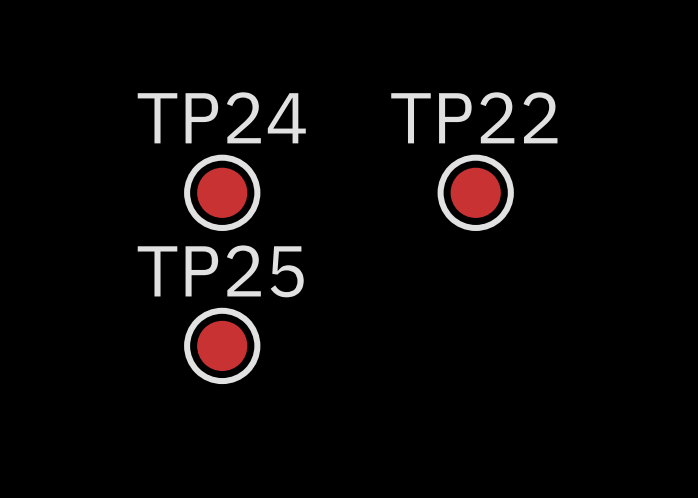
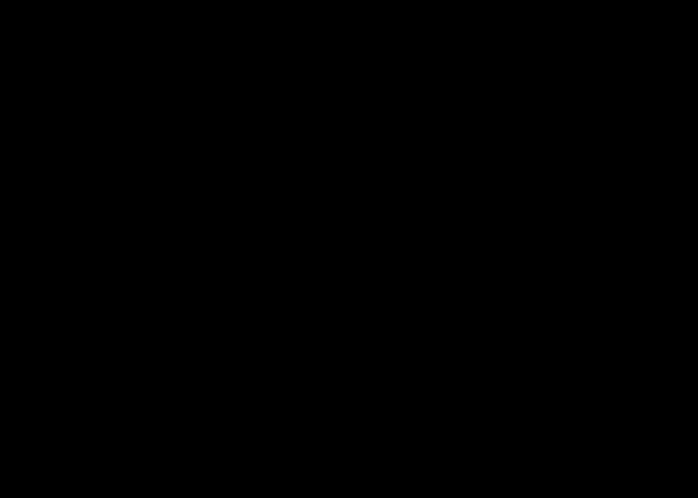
TP24: (222, 192) -> none
TP22: (475, 192) -> none
TP25: (222, 345) -> none

